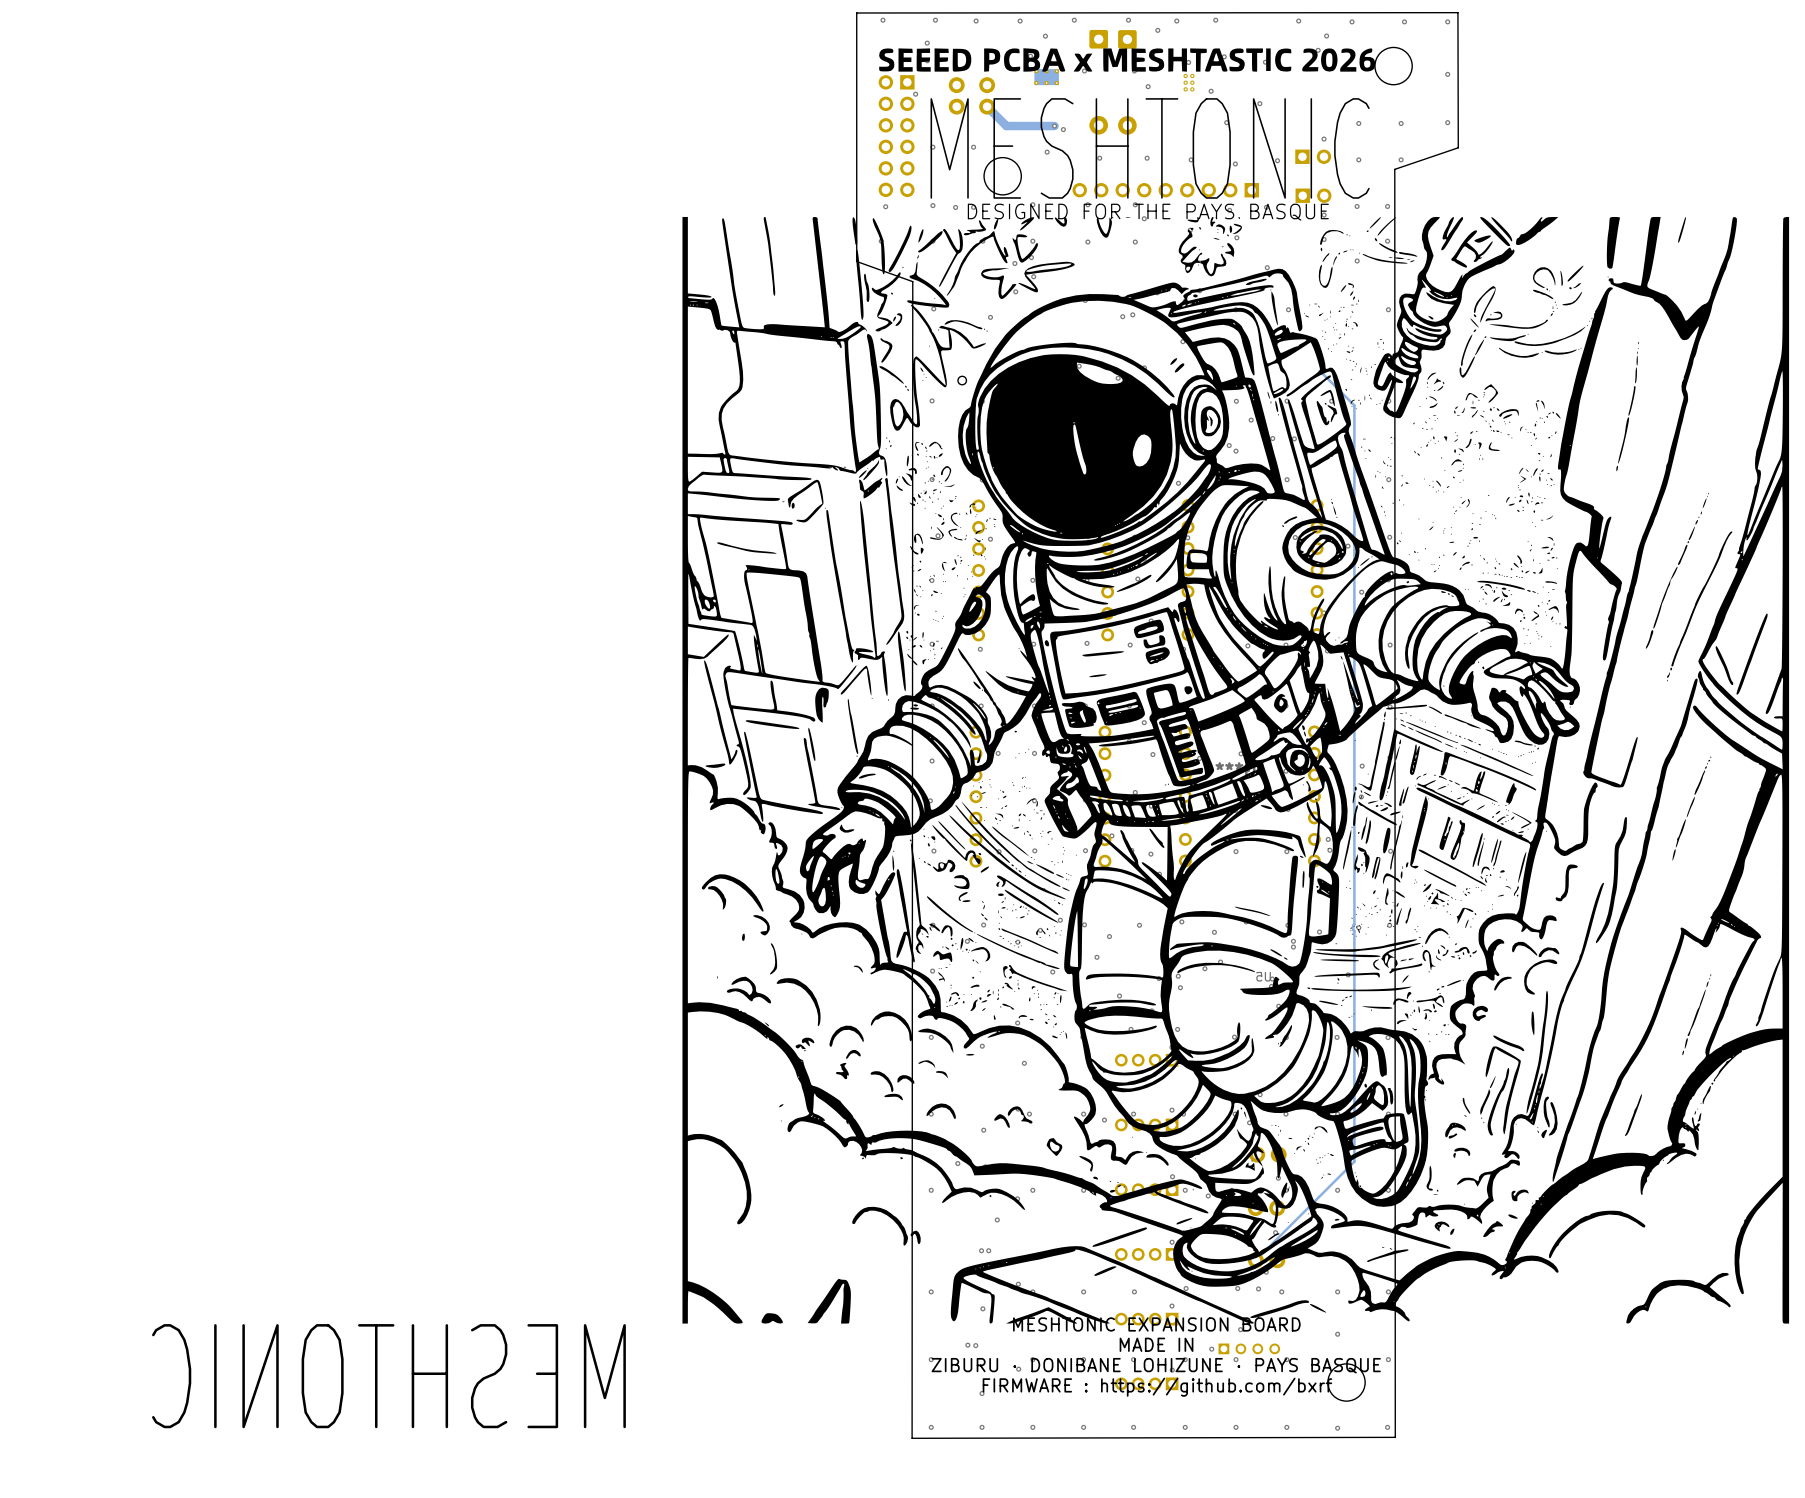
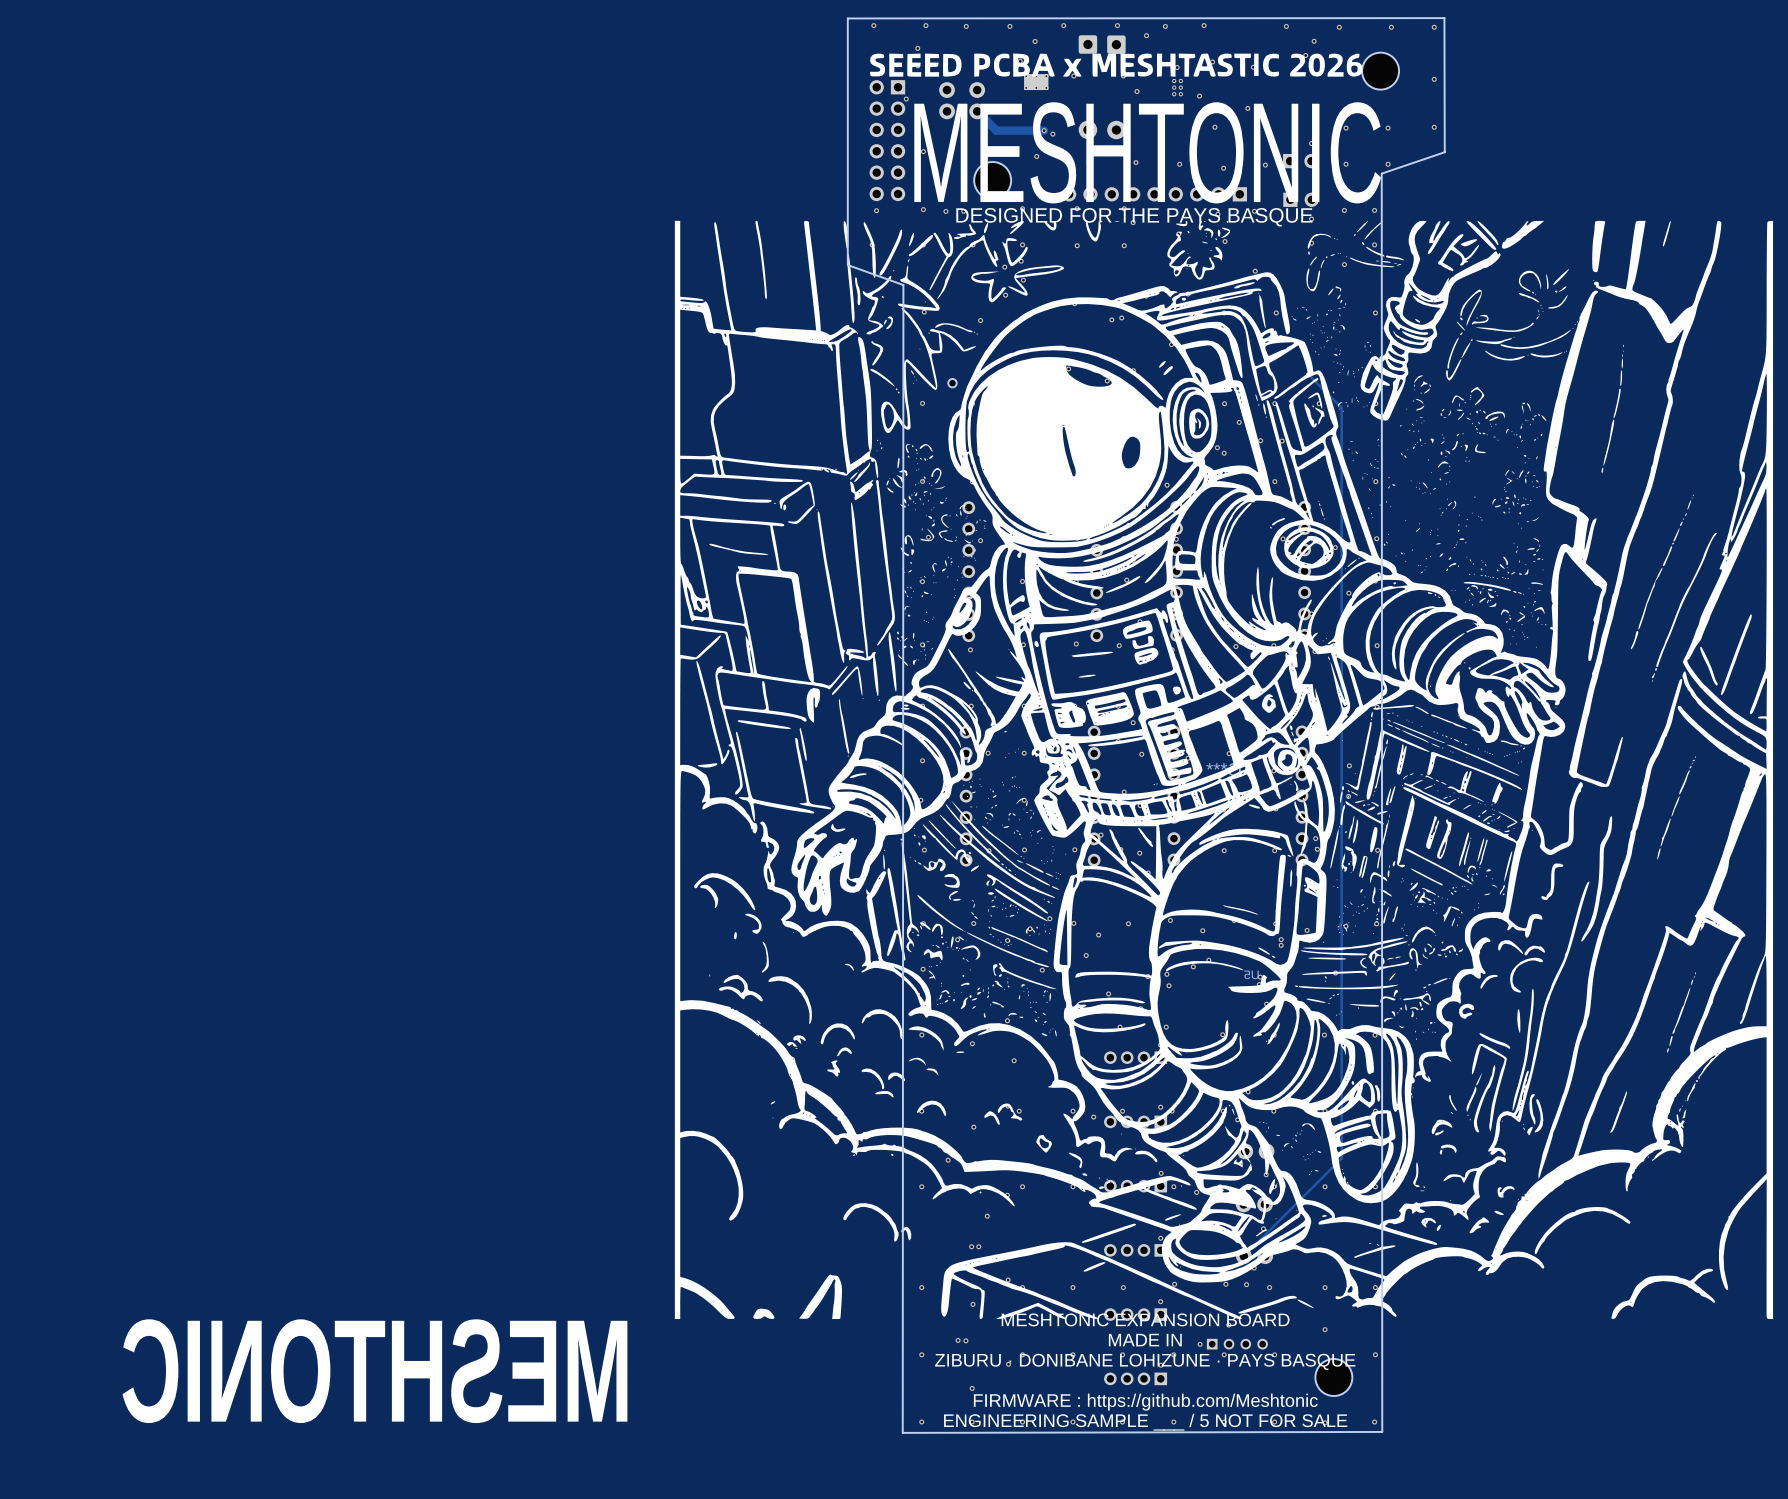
text: FIRMWARE : https://github.com/bxrf (1157, 1387) -> FIRMWARE : https://github.com/Meshtonic (1145, 1402)
text: none -> ENGINEERING SAMPLE ___ / 5 NOT FOR SALE (1145, 1422)

